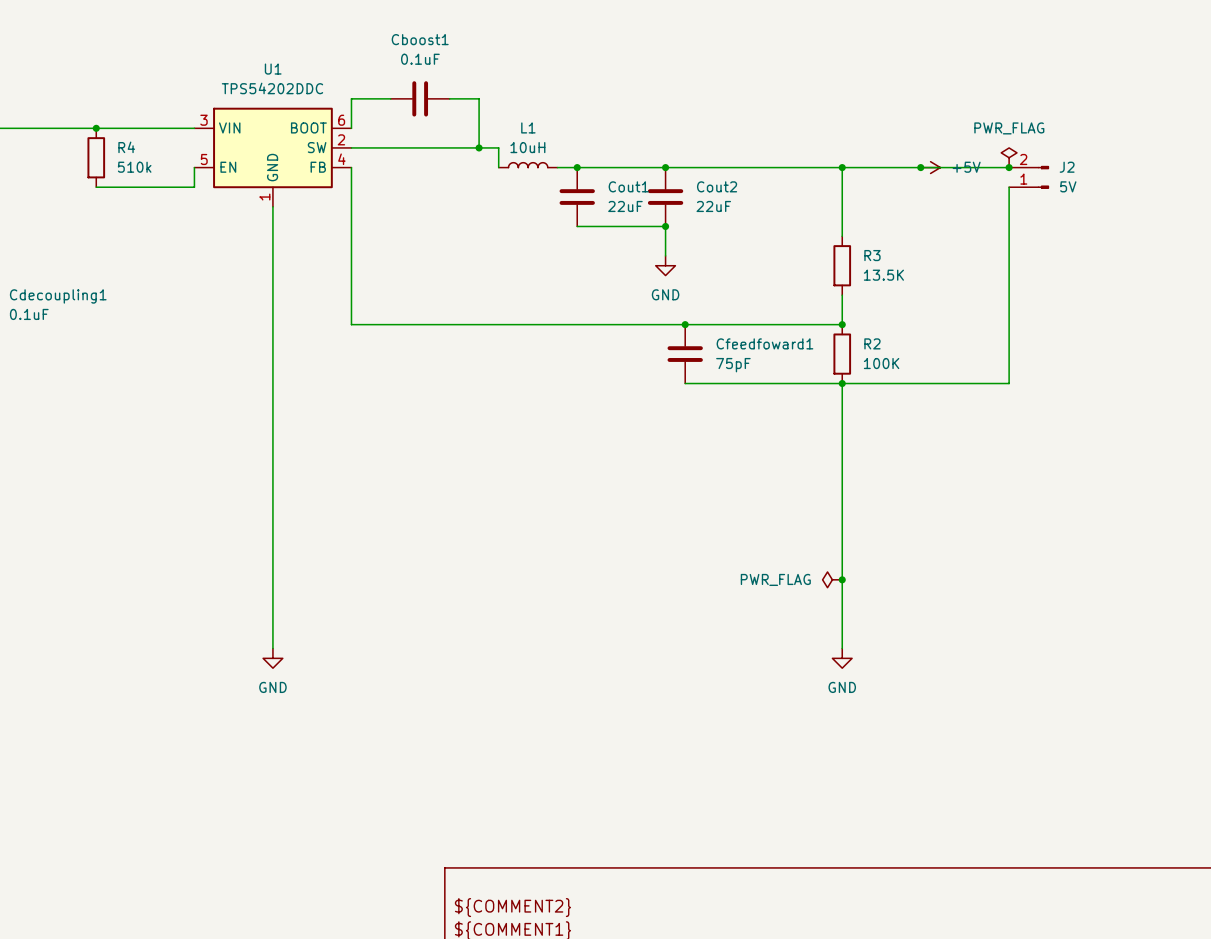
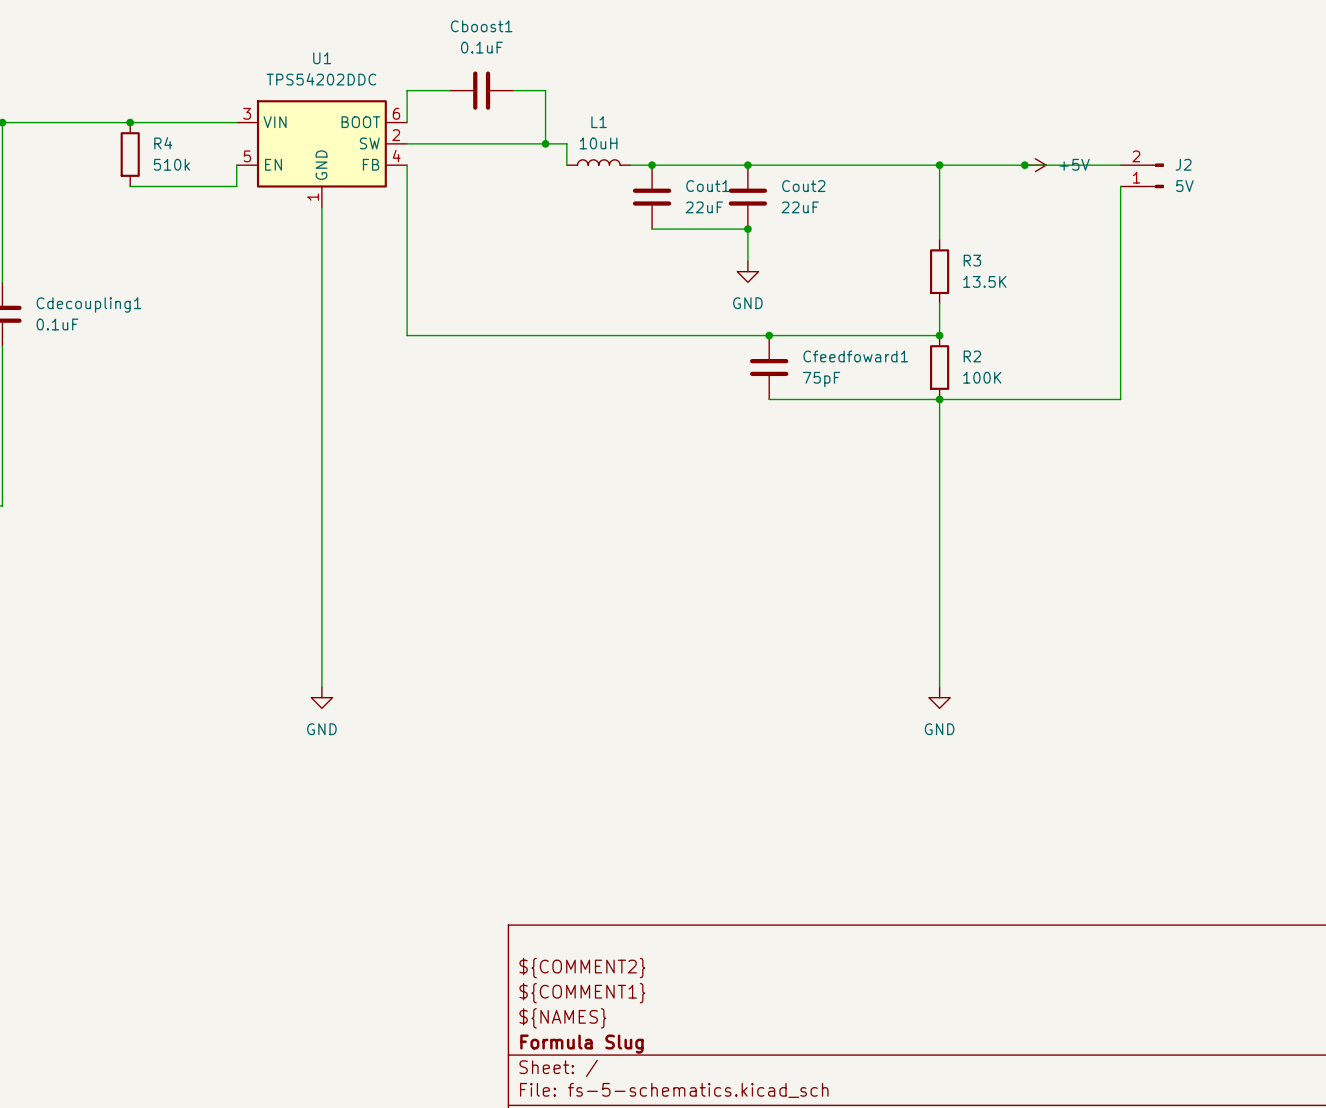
power symbol: PWR_FLAG (1009, 157) -> none
junction: (1009, 167) -> none
power symbol: PWR_FLAG (832, 579) -> none
junction: (842, 579) -> none

